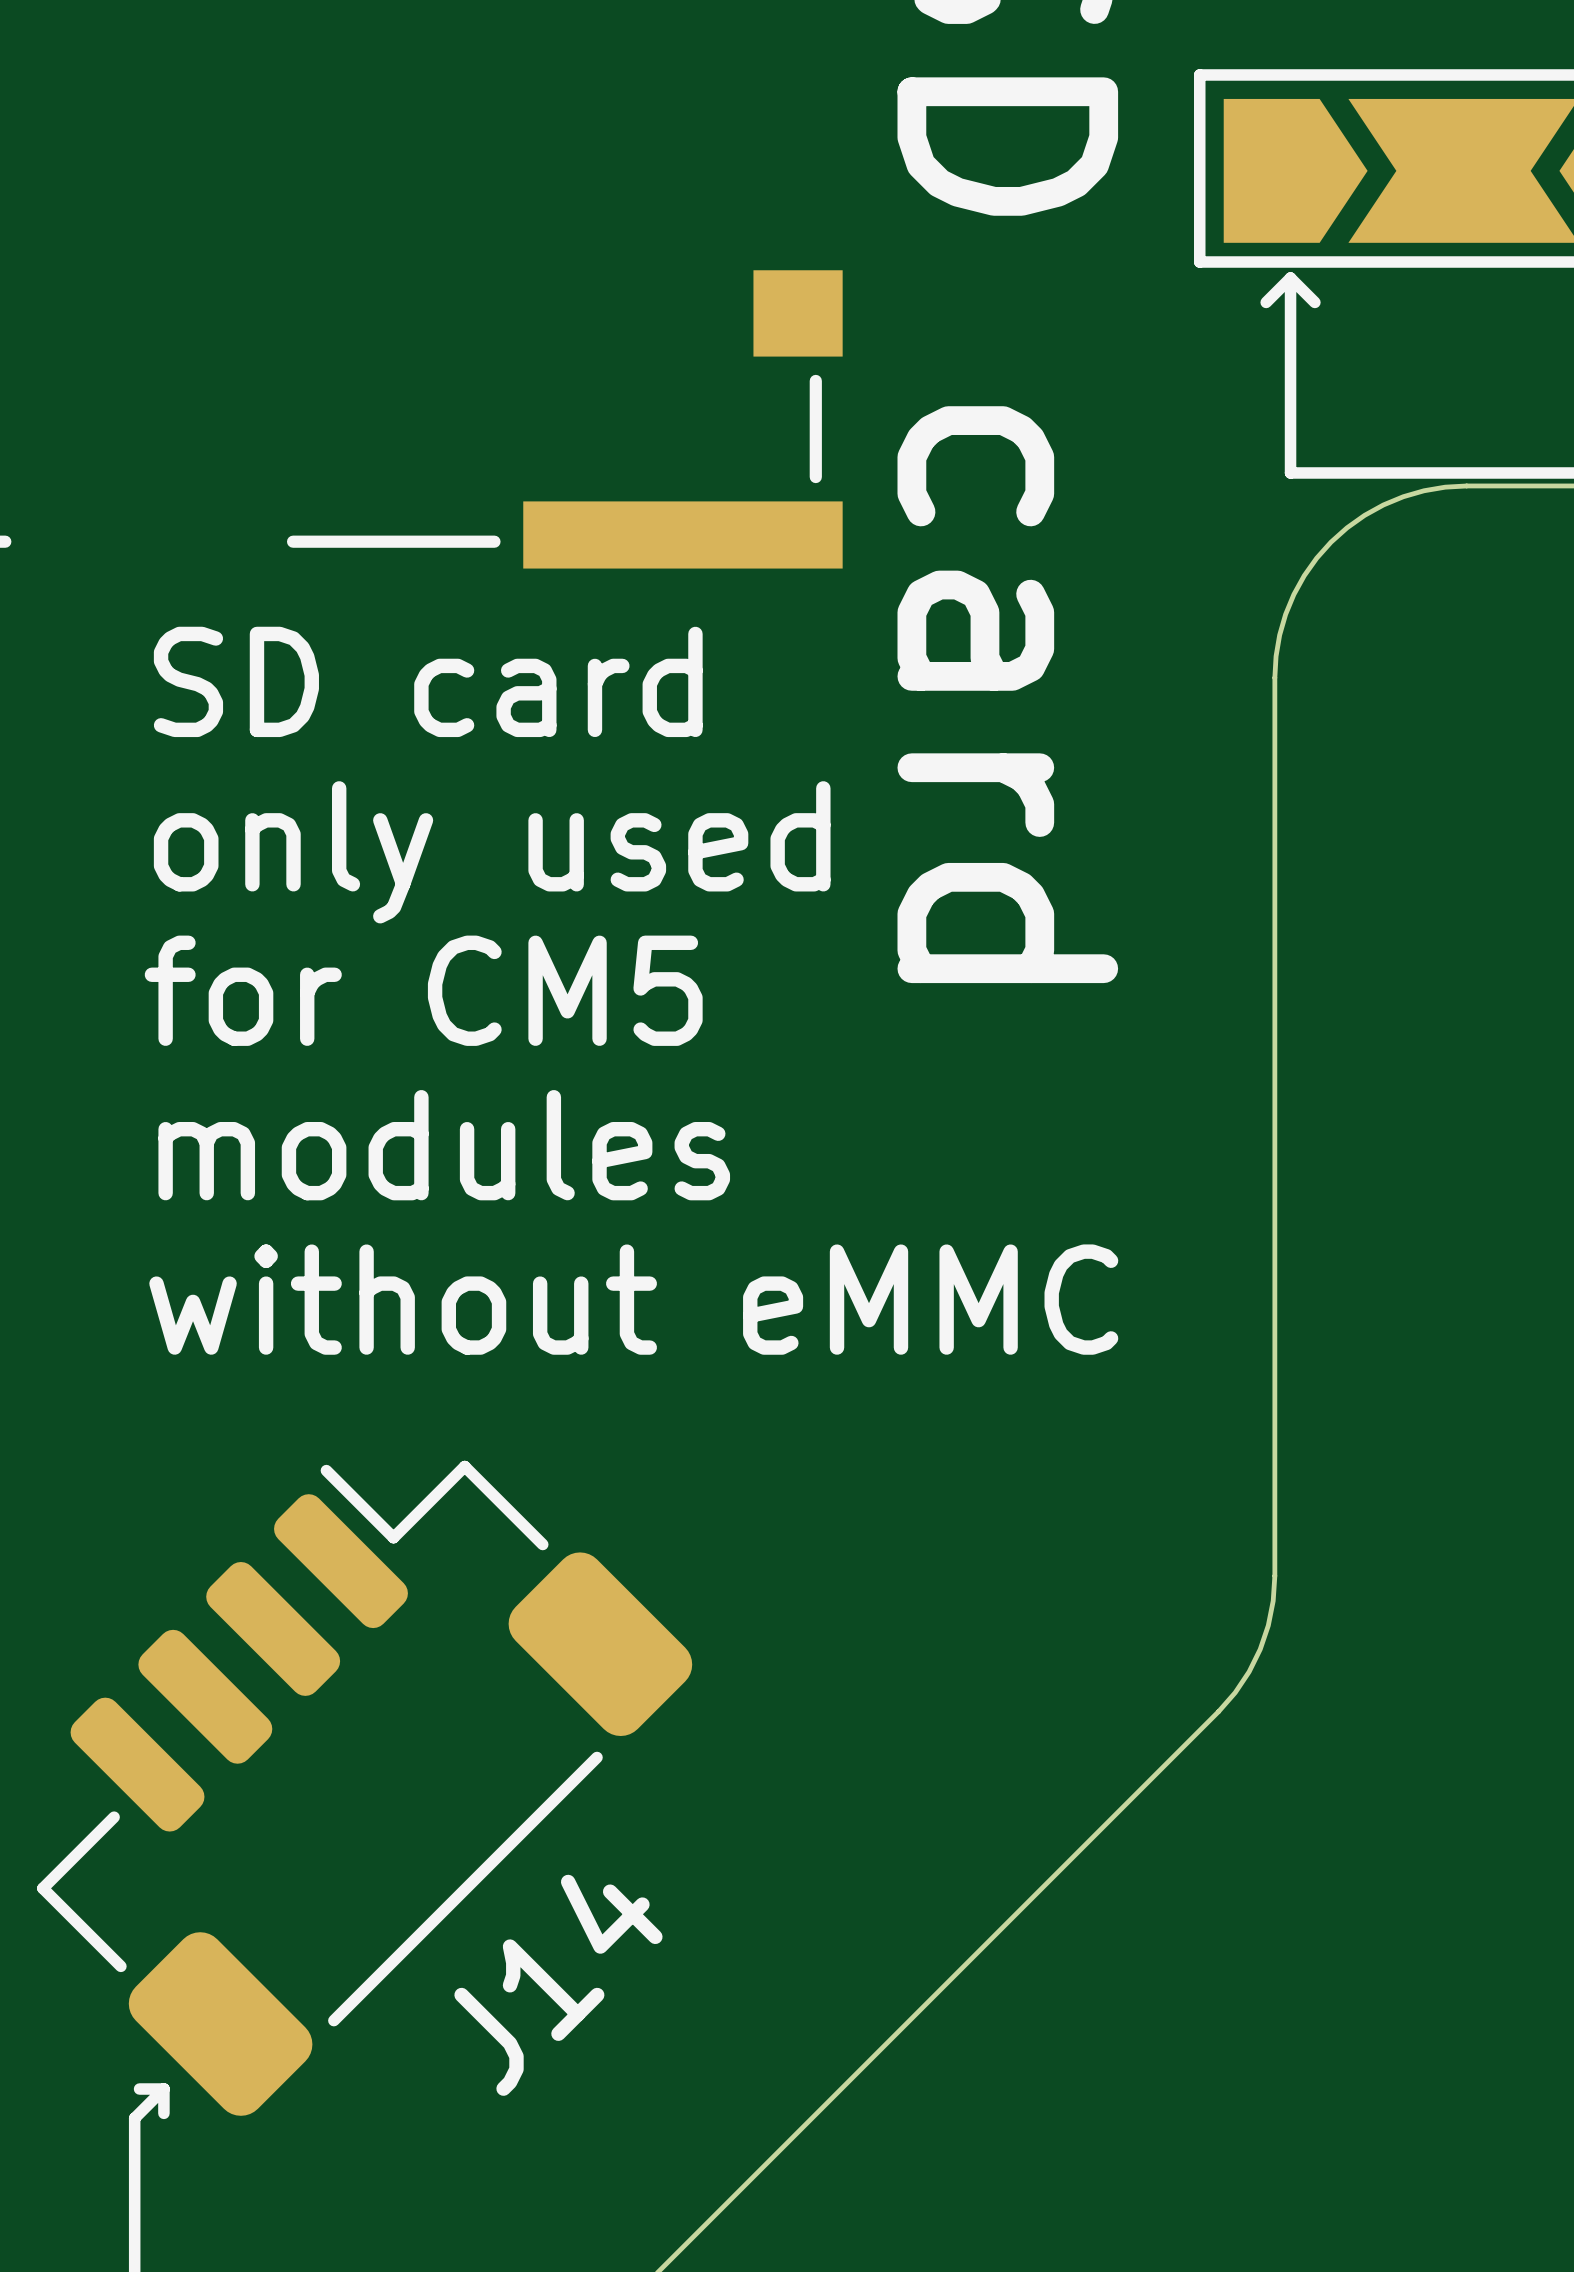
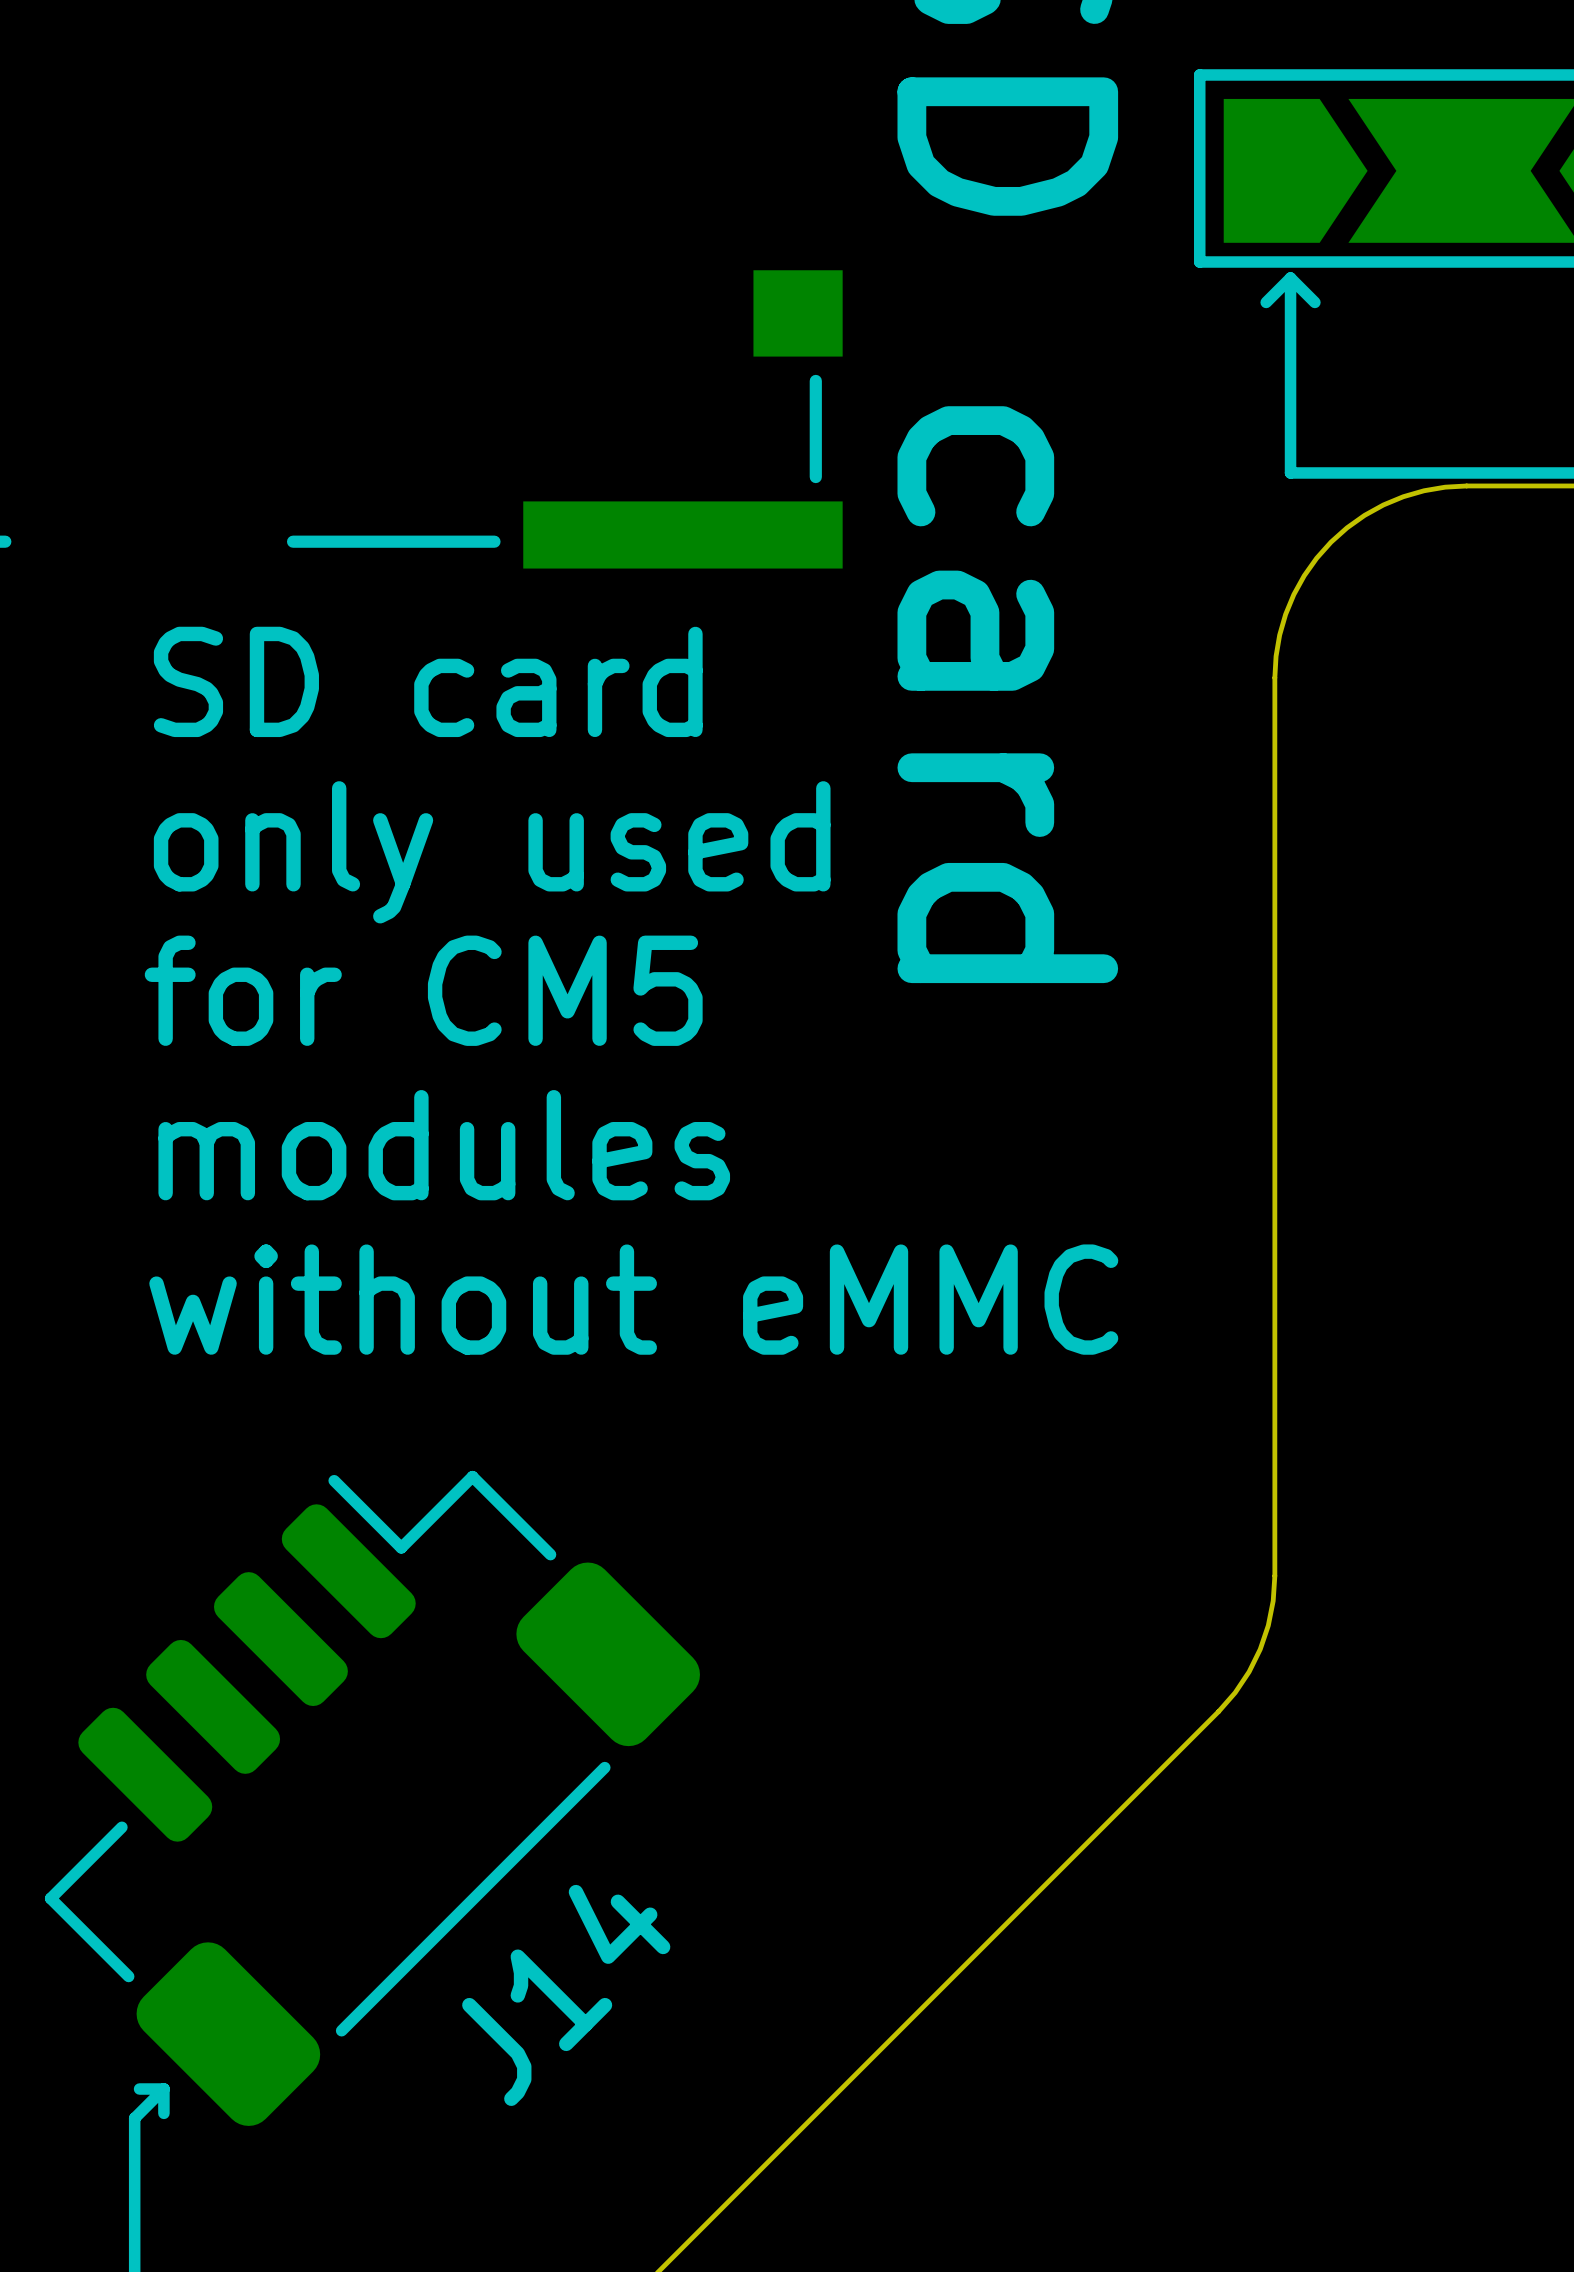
J14 position: (364, 1788) -> (372, 1798)

